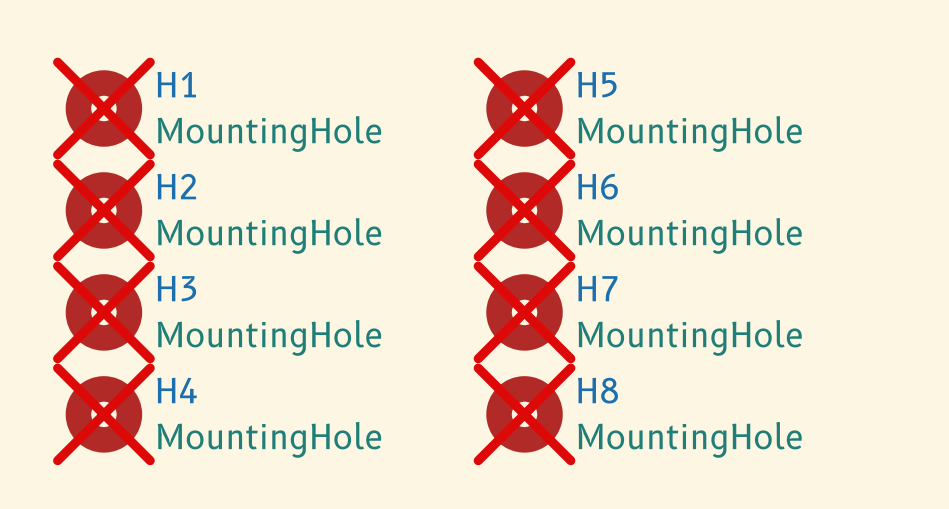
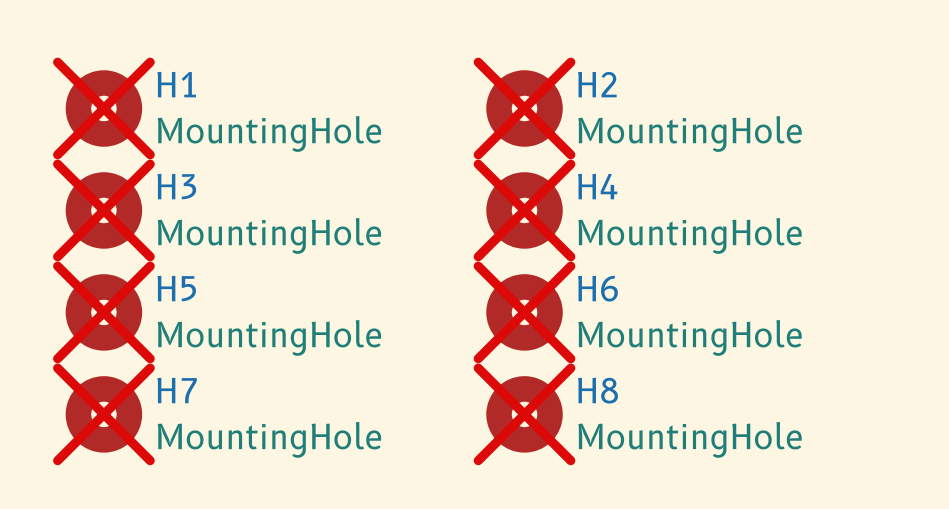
H5 name: H5 (597, 84) -> H2 (597, 84)
H2 name: H2 (176, 186) -> H3 (176, 186)
H6 name: H6 (597, 186) -> H4 (597, 186)
H3 name: H3 (176, 288) -> H5 (176, 288)
H7 name: H7 (597, 288) -> H6 (597, 288)
H4 name: H4 (177, 390) -> H7 (177, 390)

